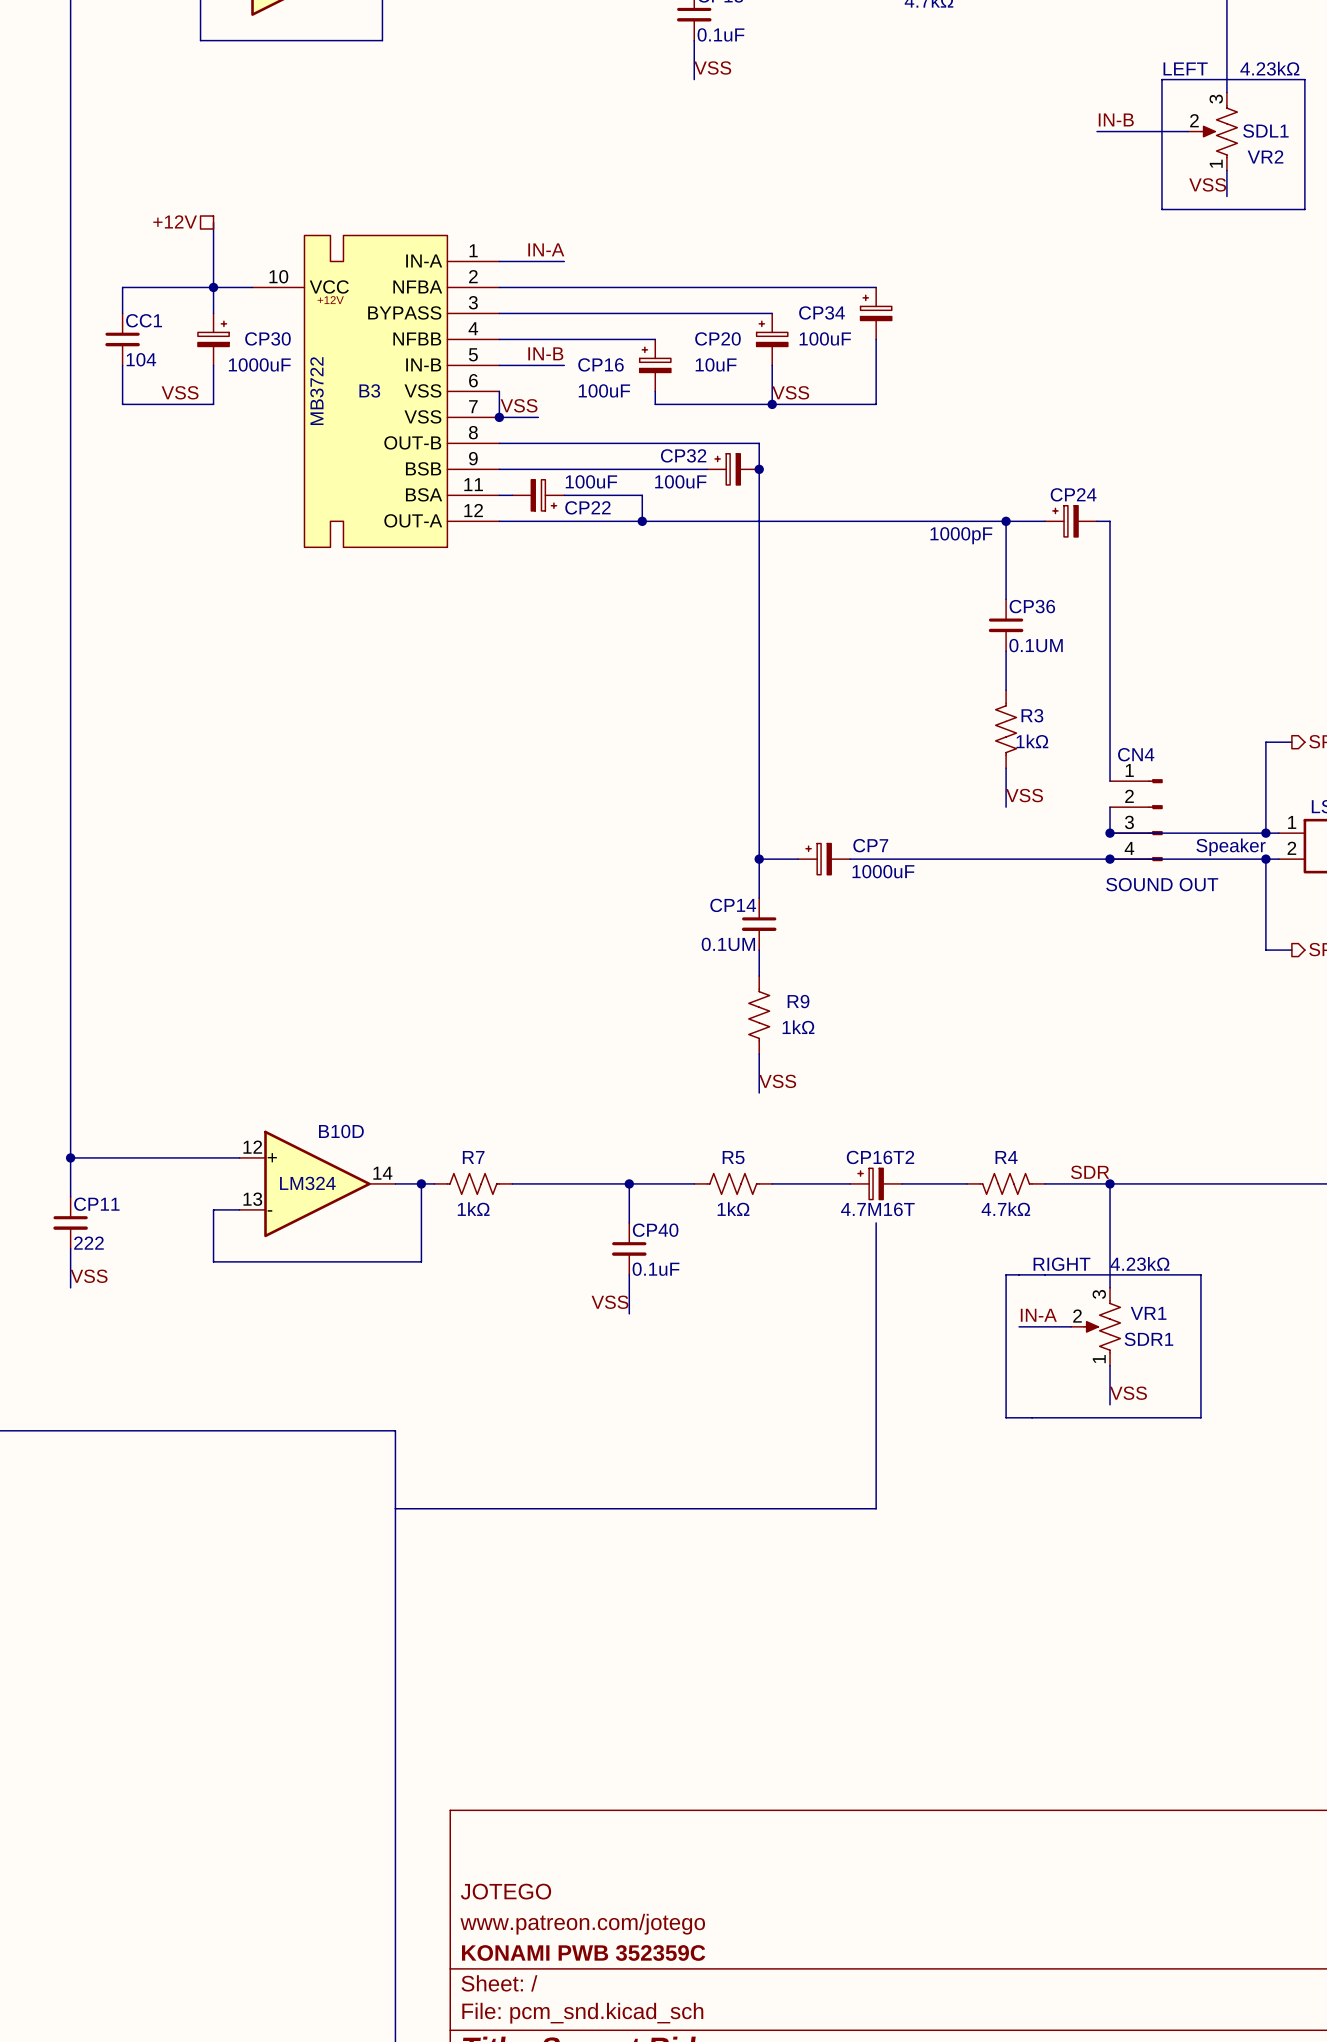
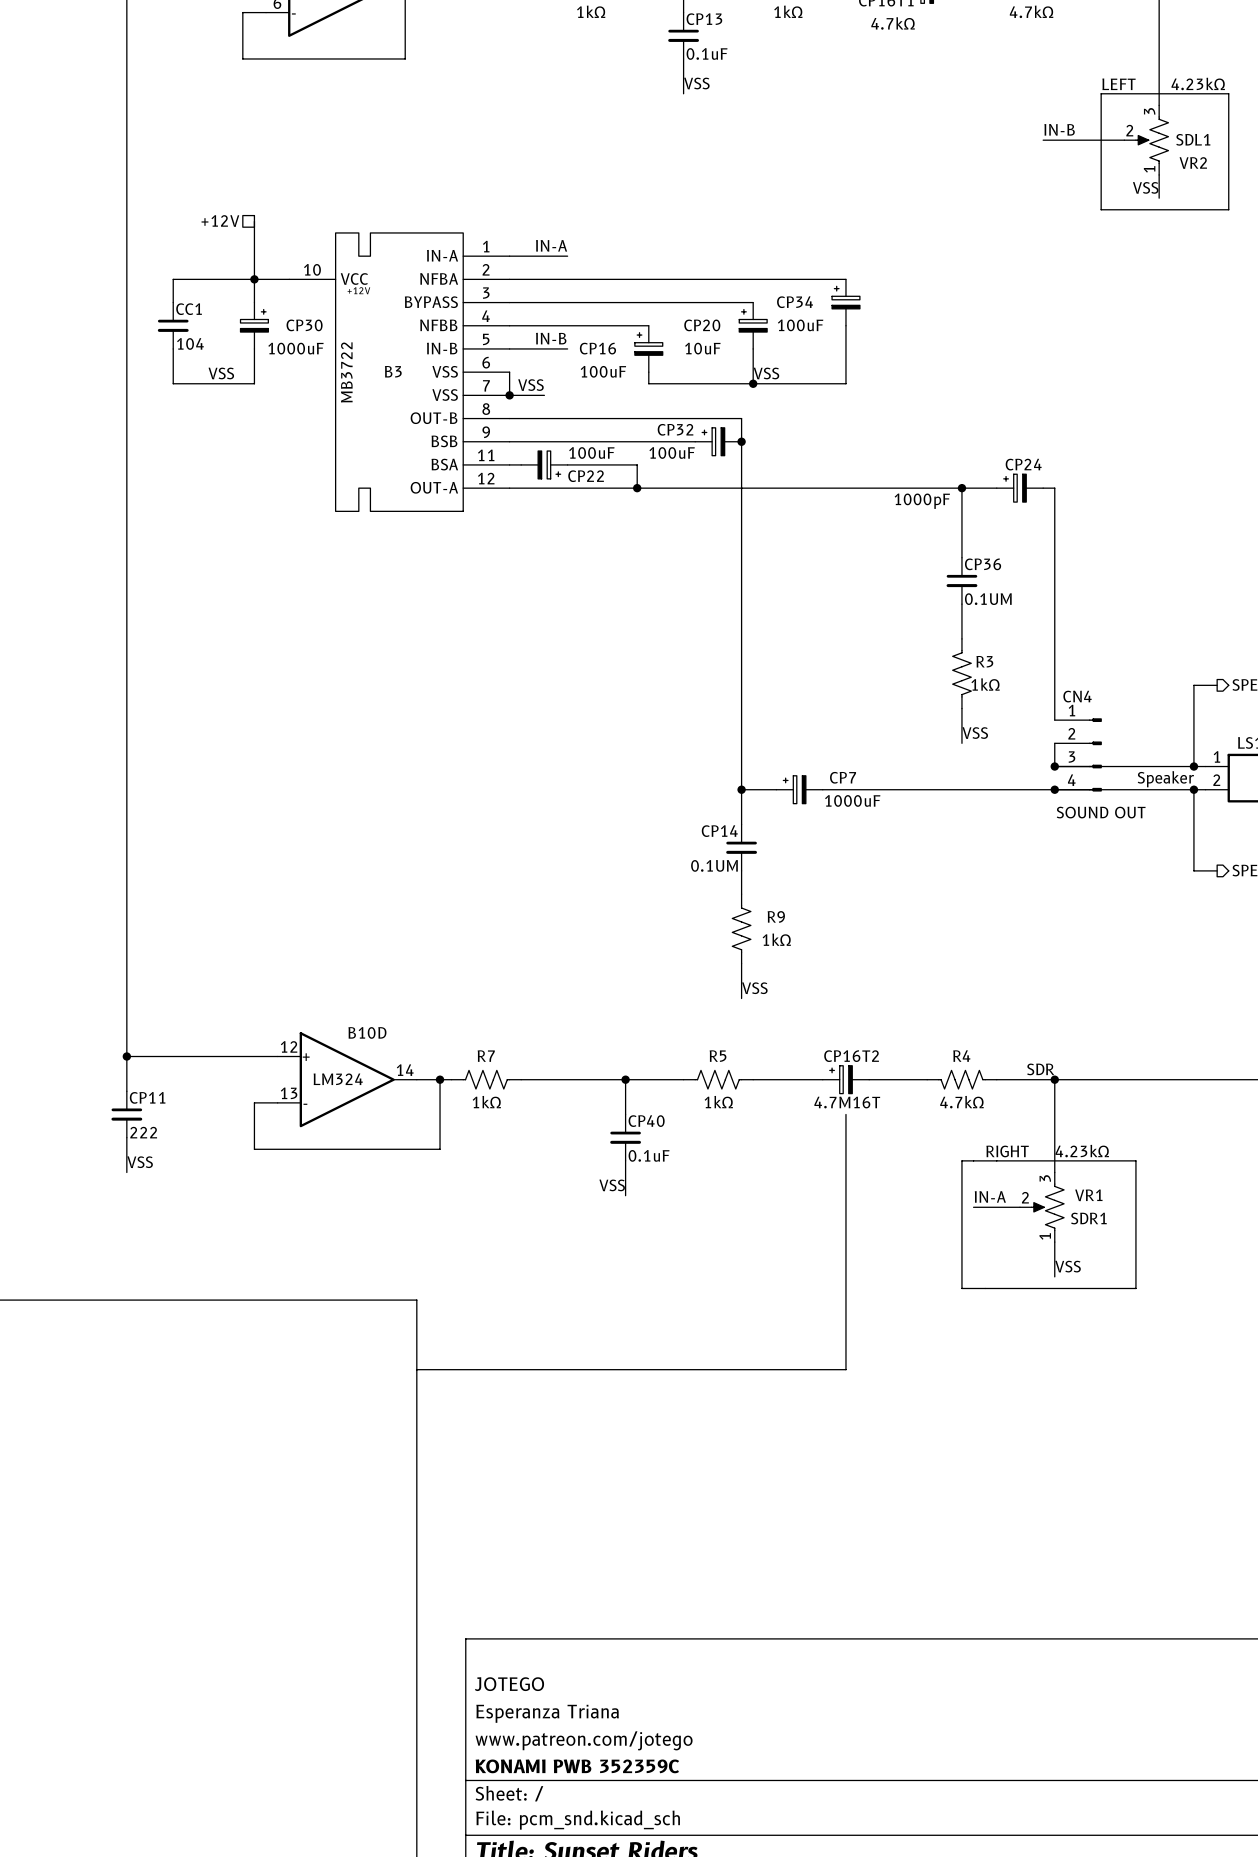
title block: none -> JOTEGO (509, 1684)
title block: JOTEGO (505, 1891) -> Esperanza Triana (547, 1713)

